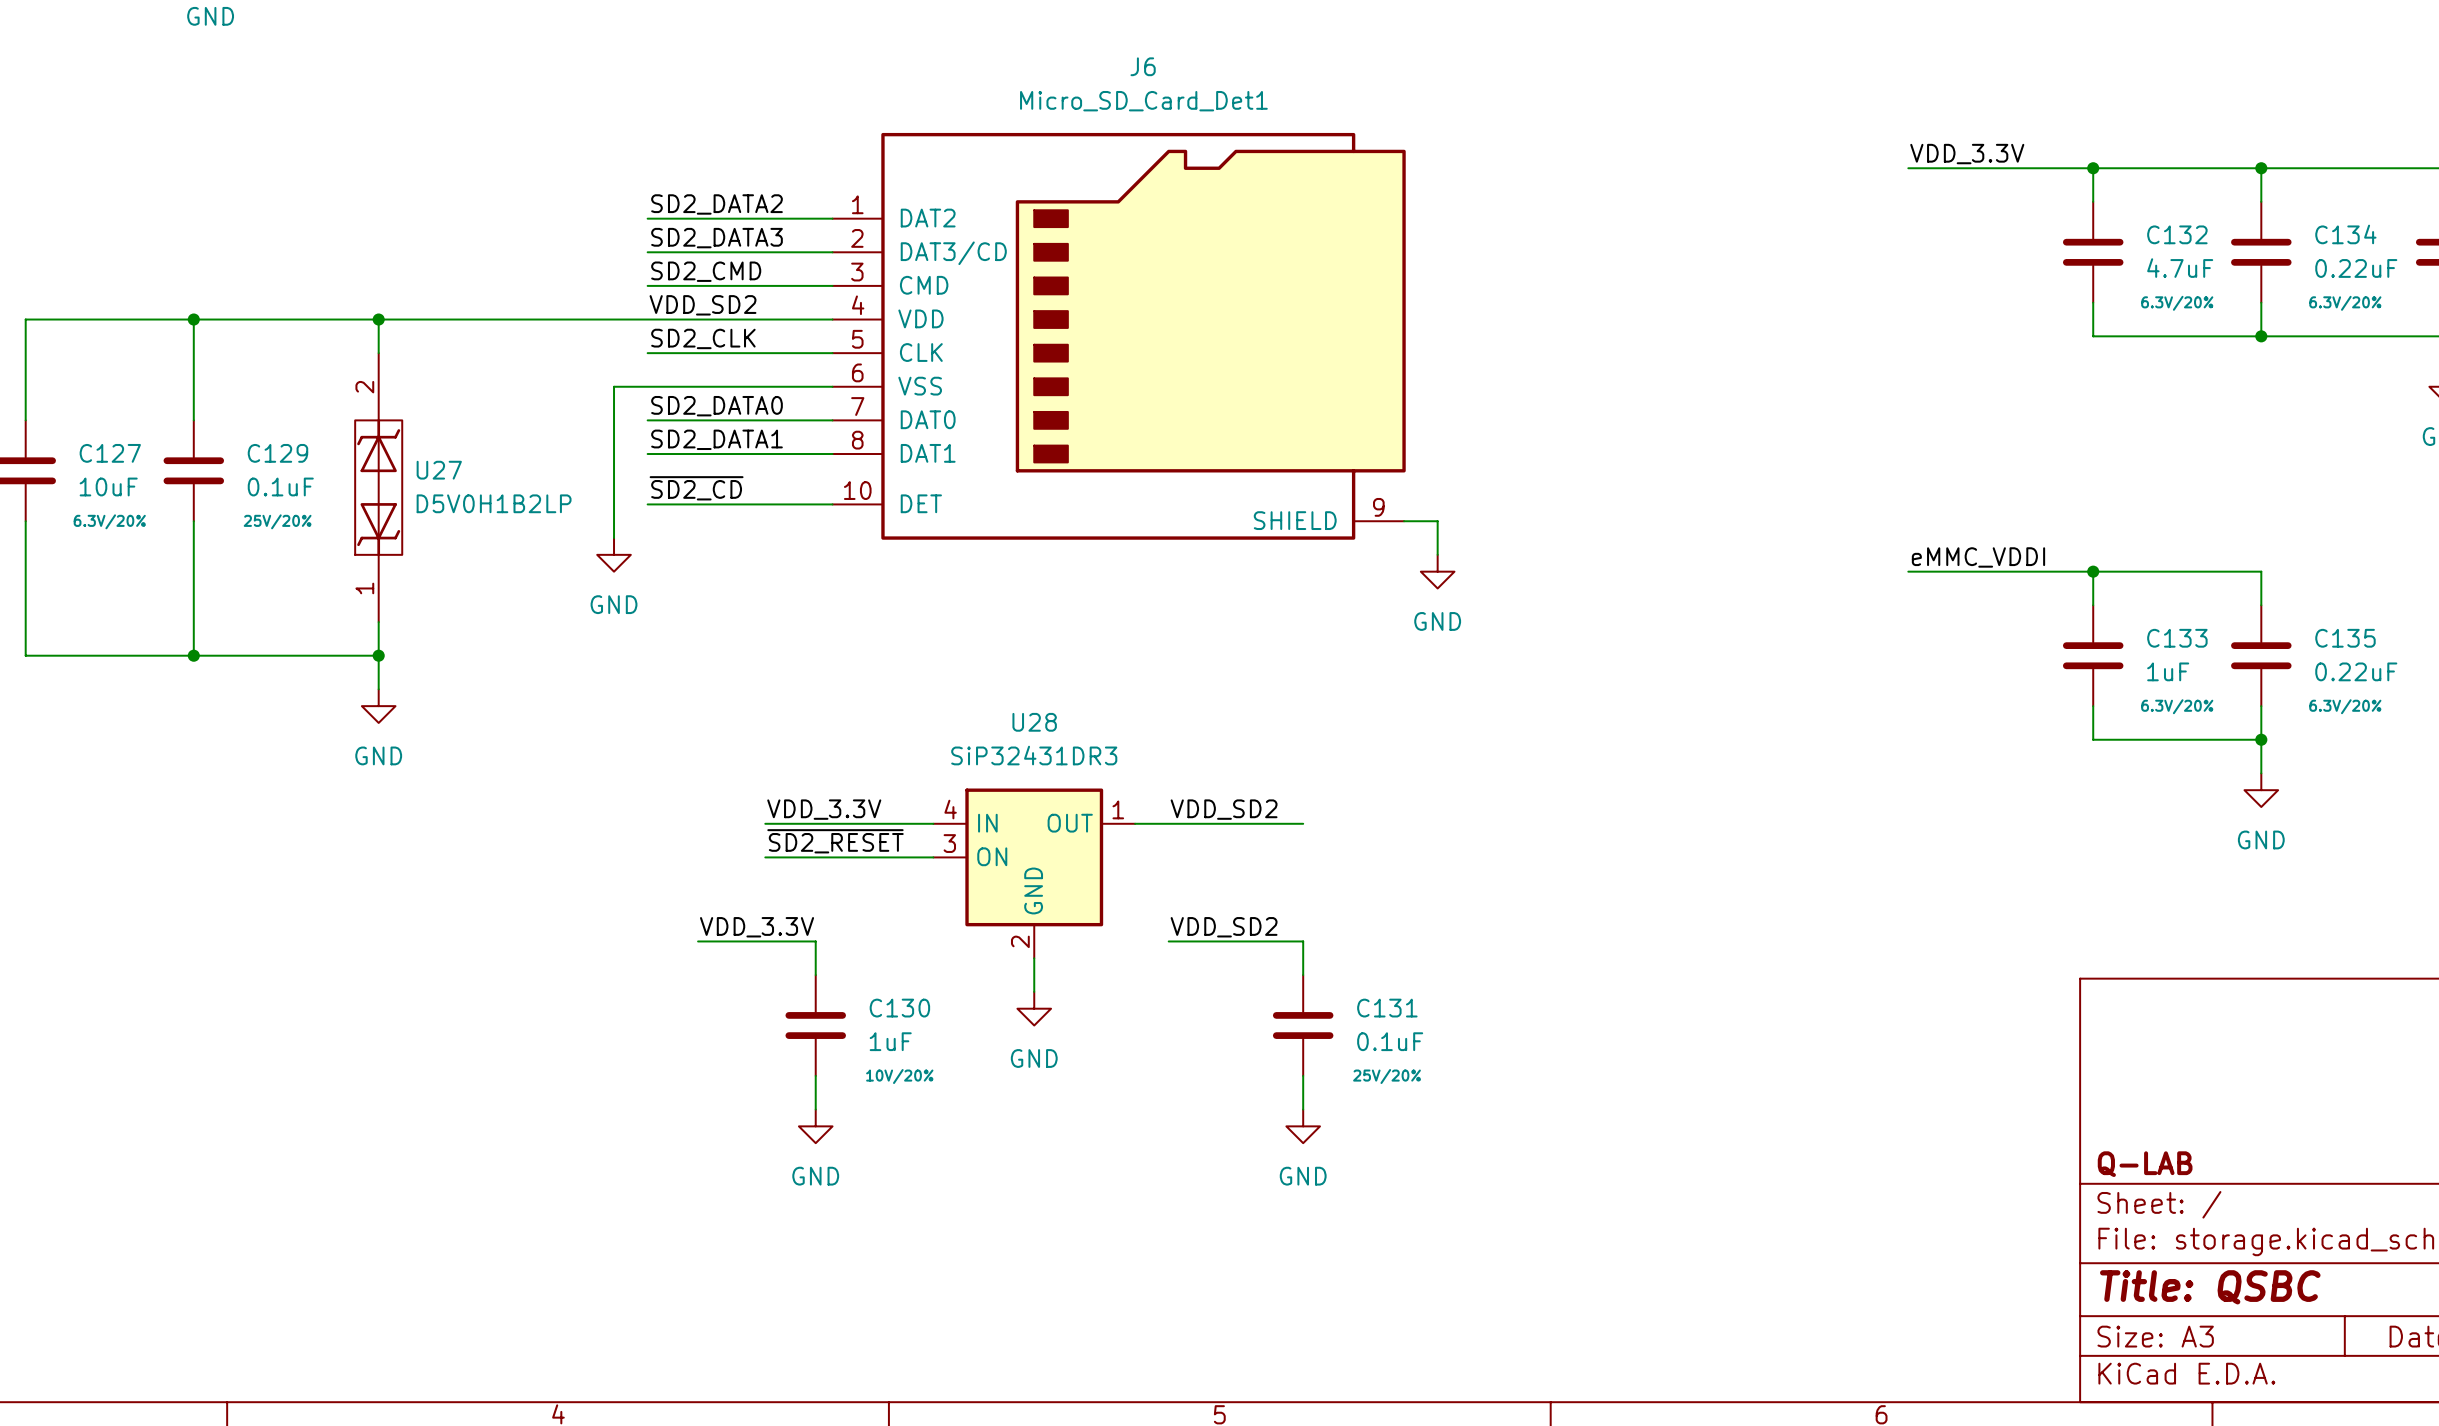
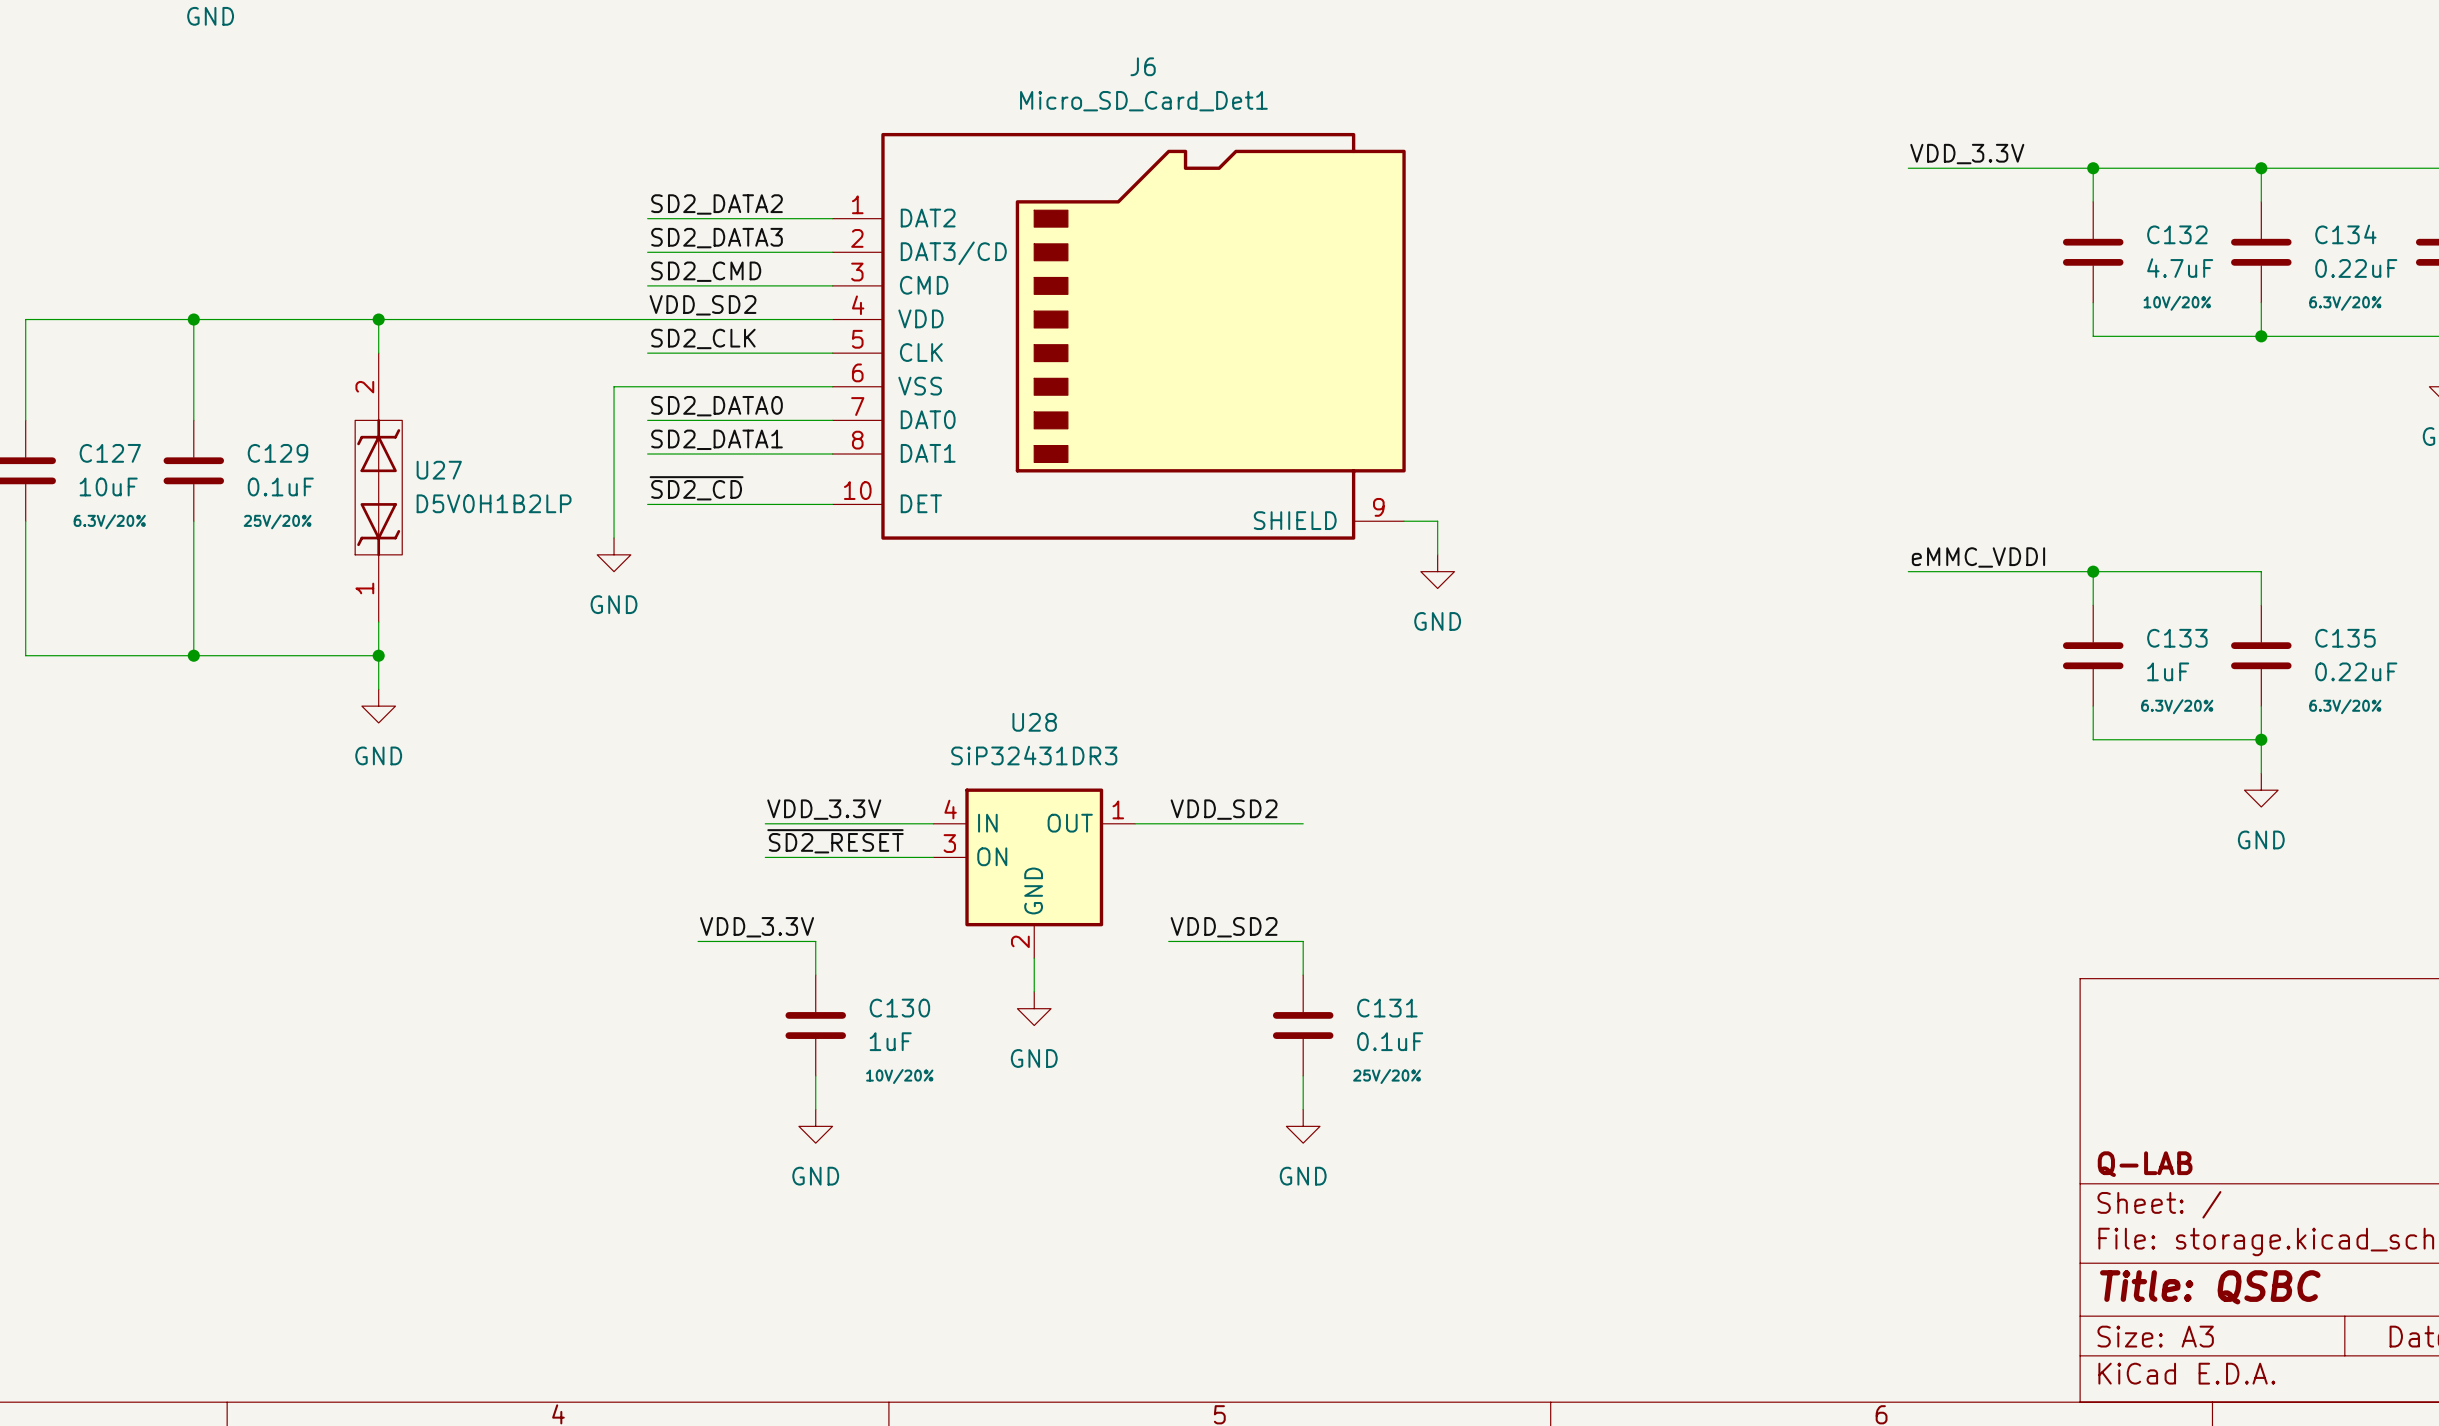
C132 text: 6.3V/20% (2177, 303) -> 10V/20% (2177, 303)

